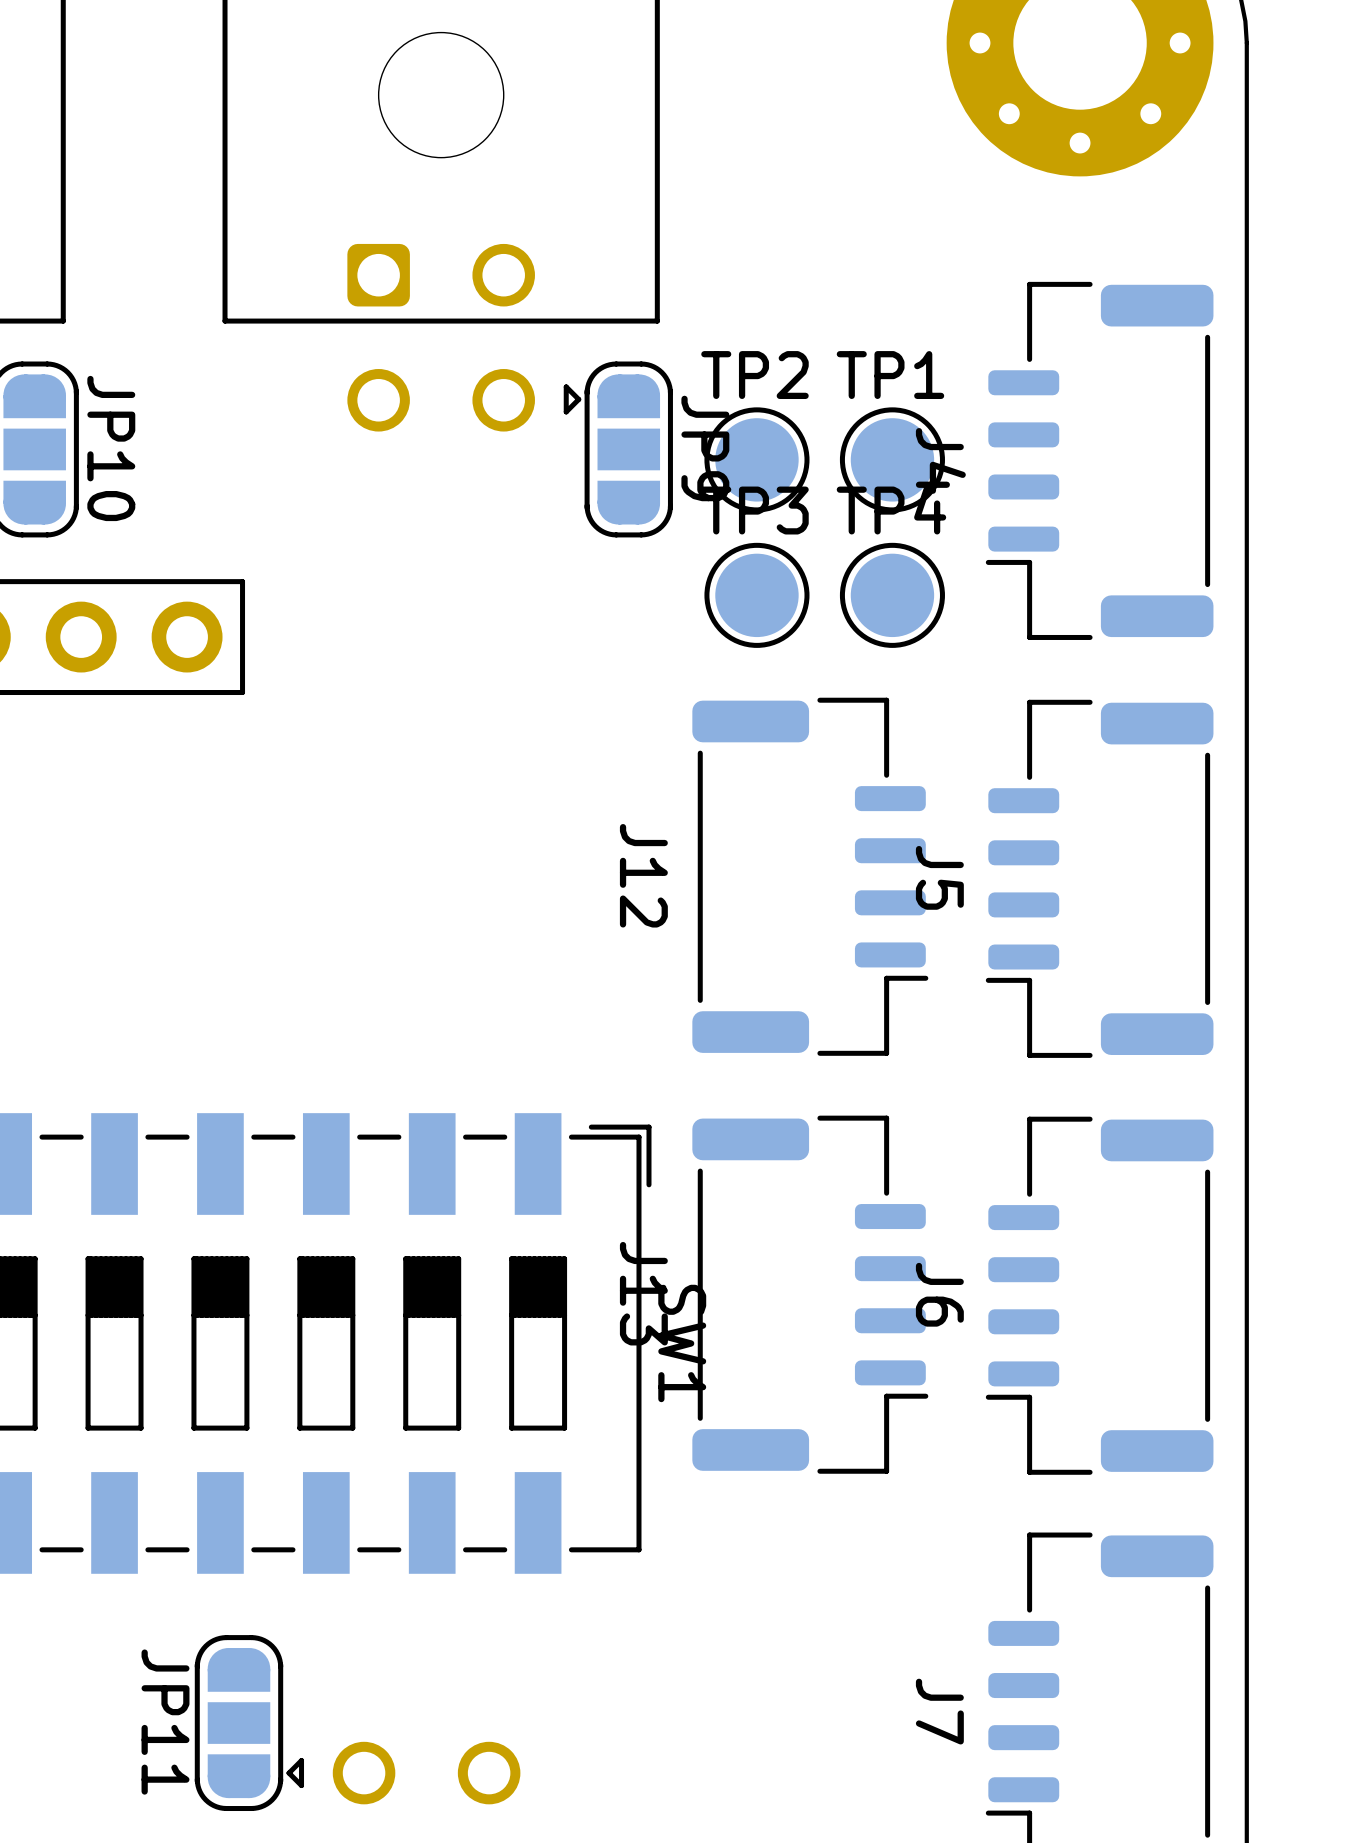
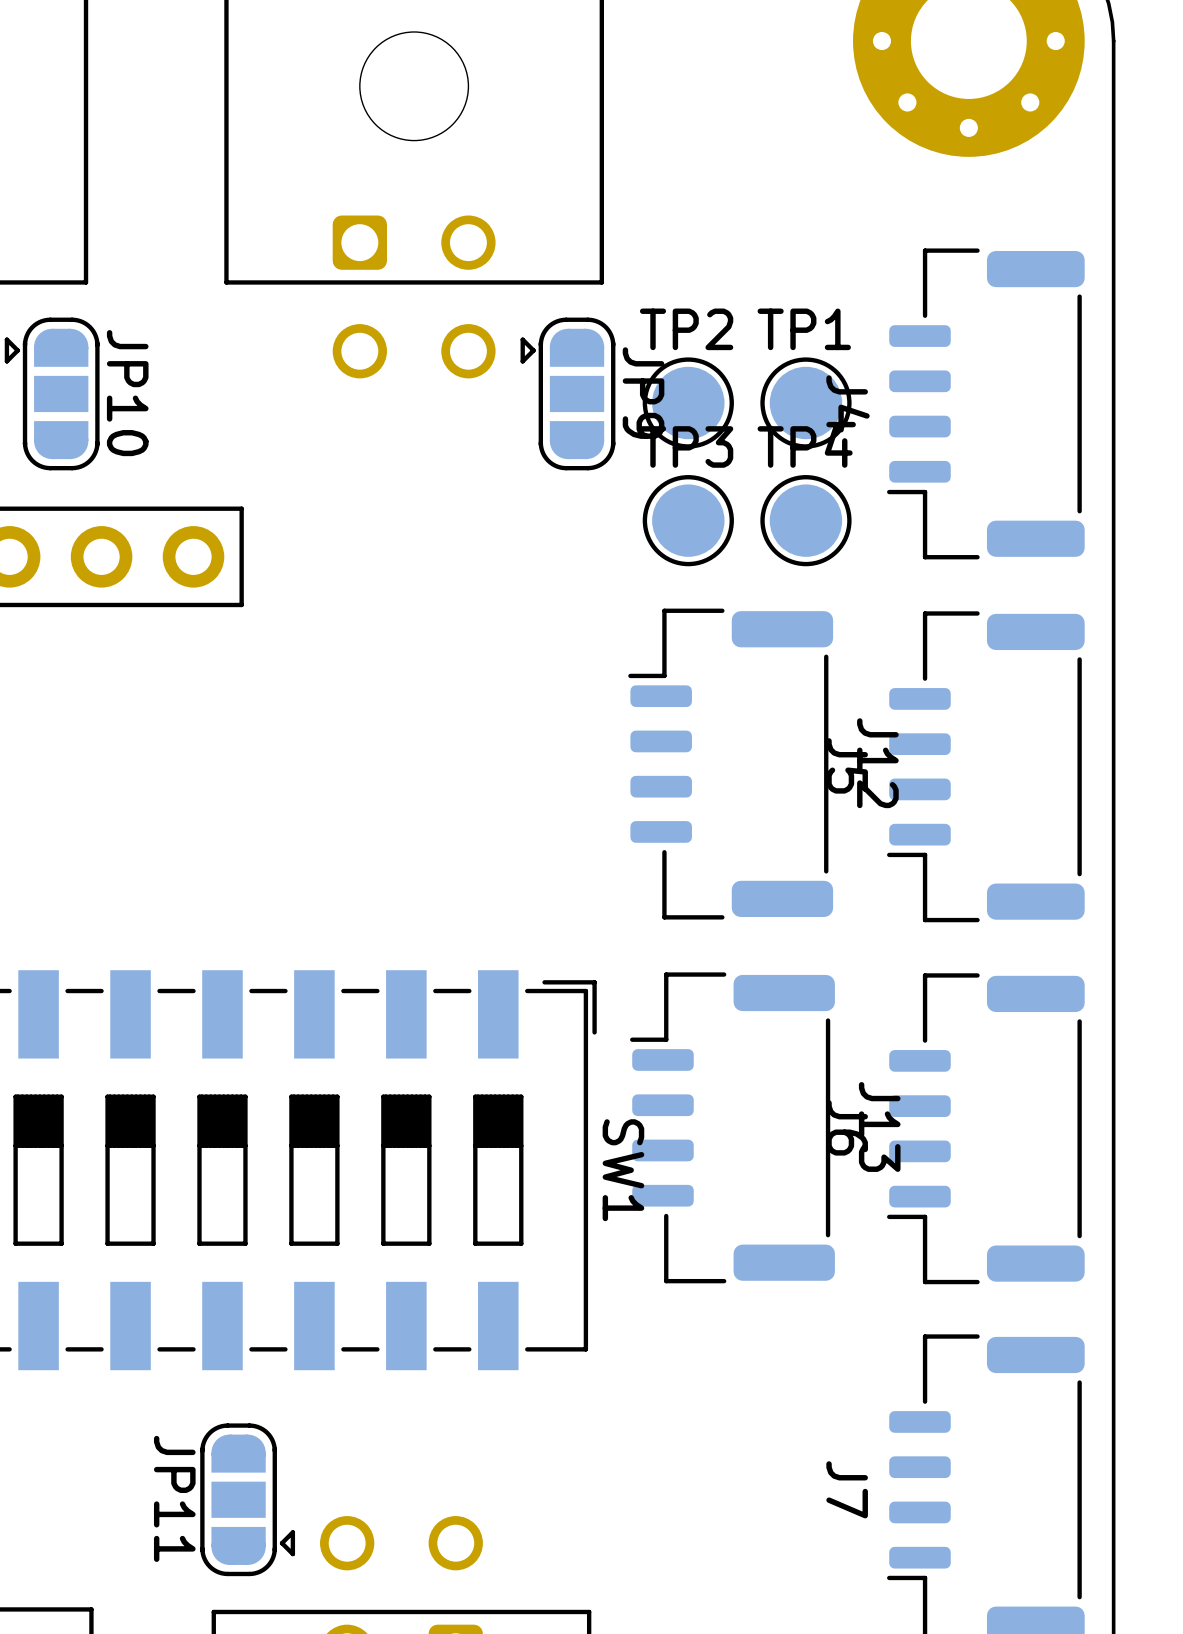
J12 rotation: 0° (810, 876) -> 180° (730, 764)
J13 rotation: 0° (810, 1294) -> 180° (732, 1127)

